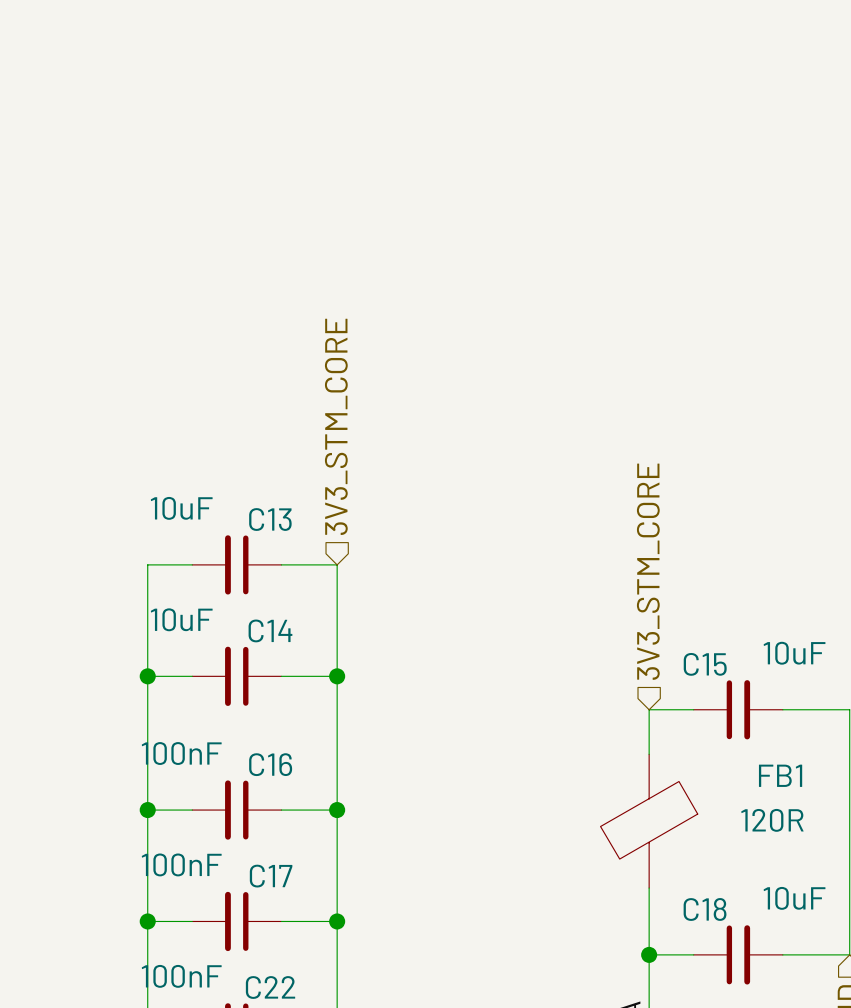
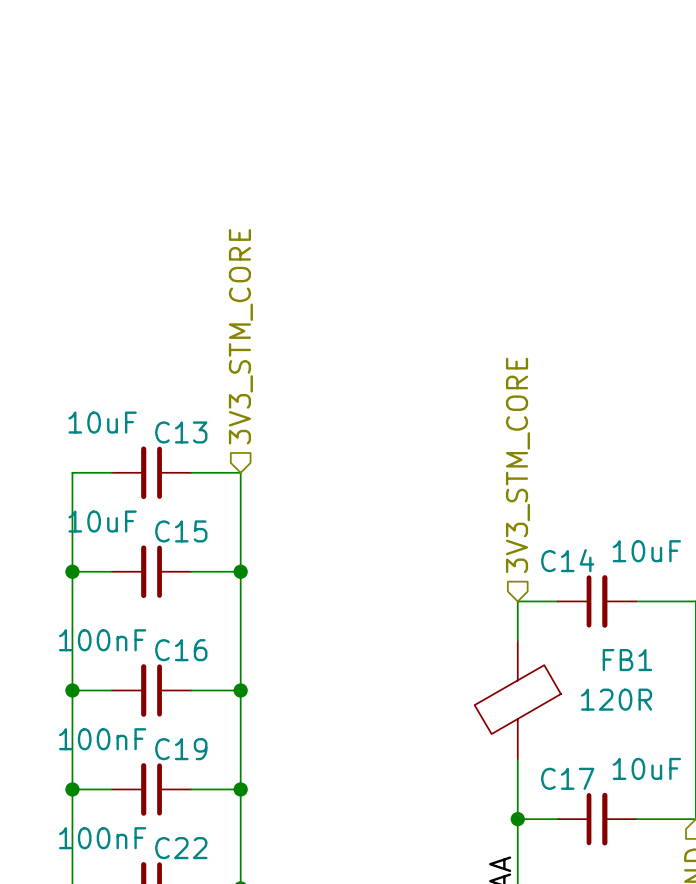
C14 name: C14 (270, 630) -> C15 (181, 531)
C15 name: C15 (705, 664) -> C14 (567, 560)
C17 name: C17 (271, 876) -> C19 (181, 749)
C18 name: C18 (705, 909) -> C17 (567, 778)

